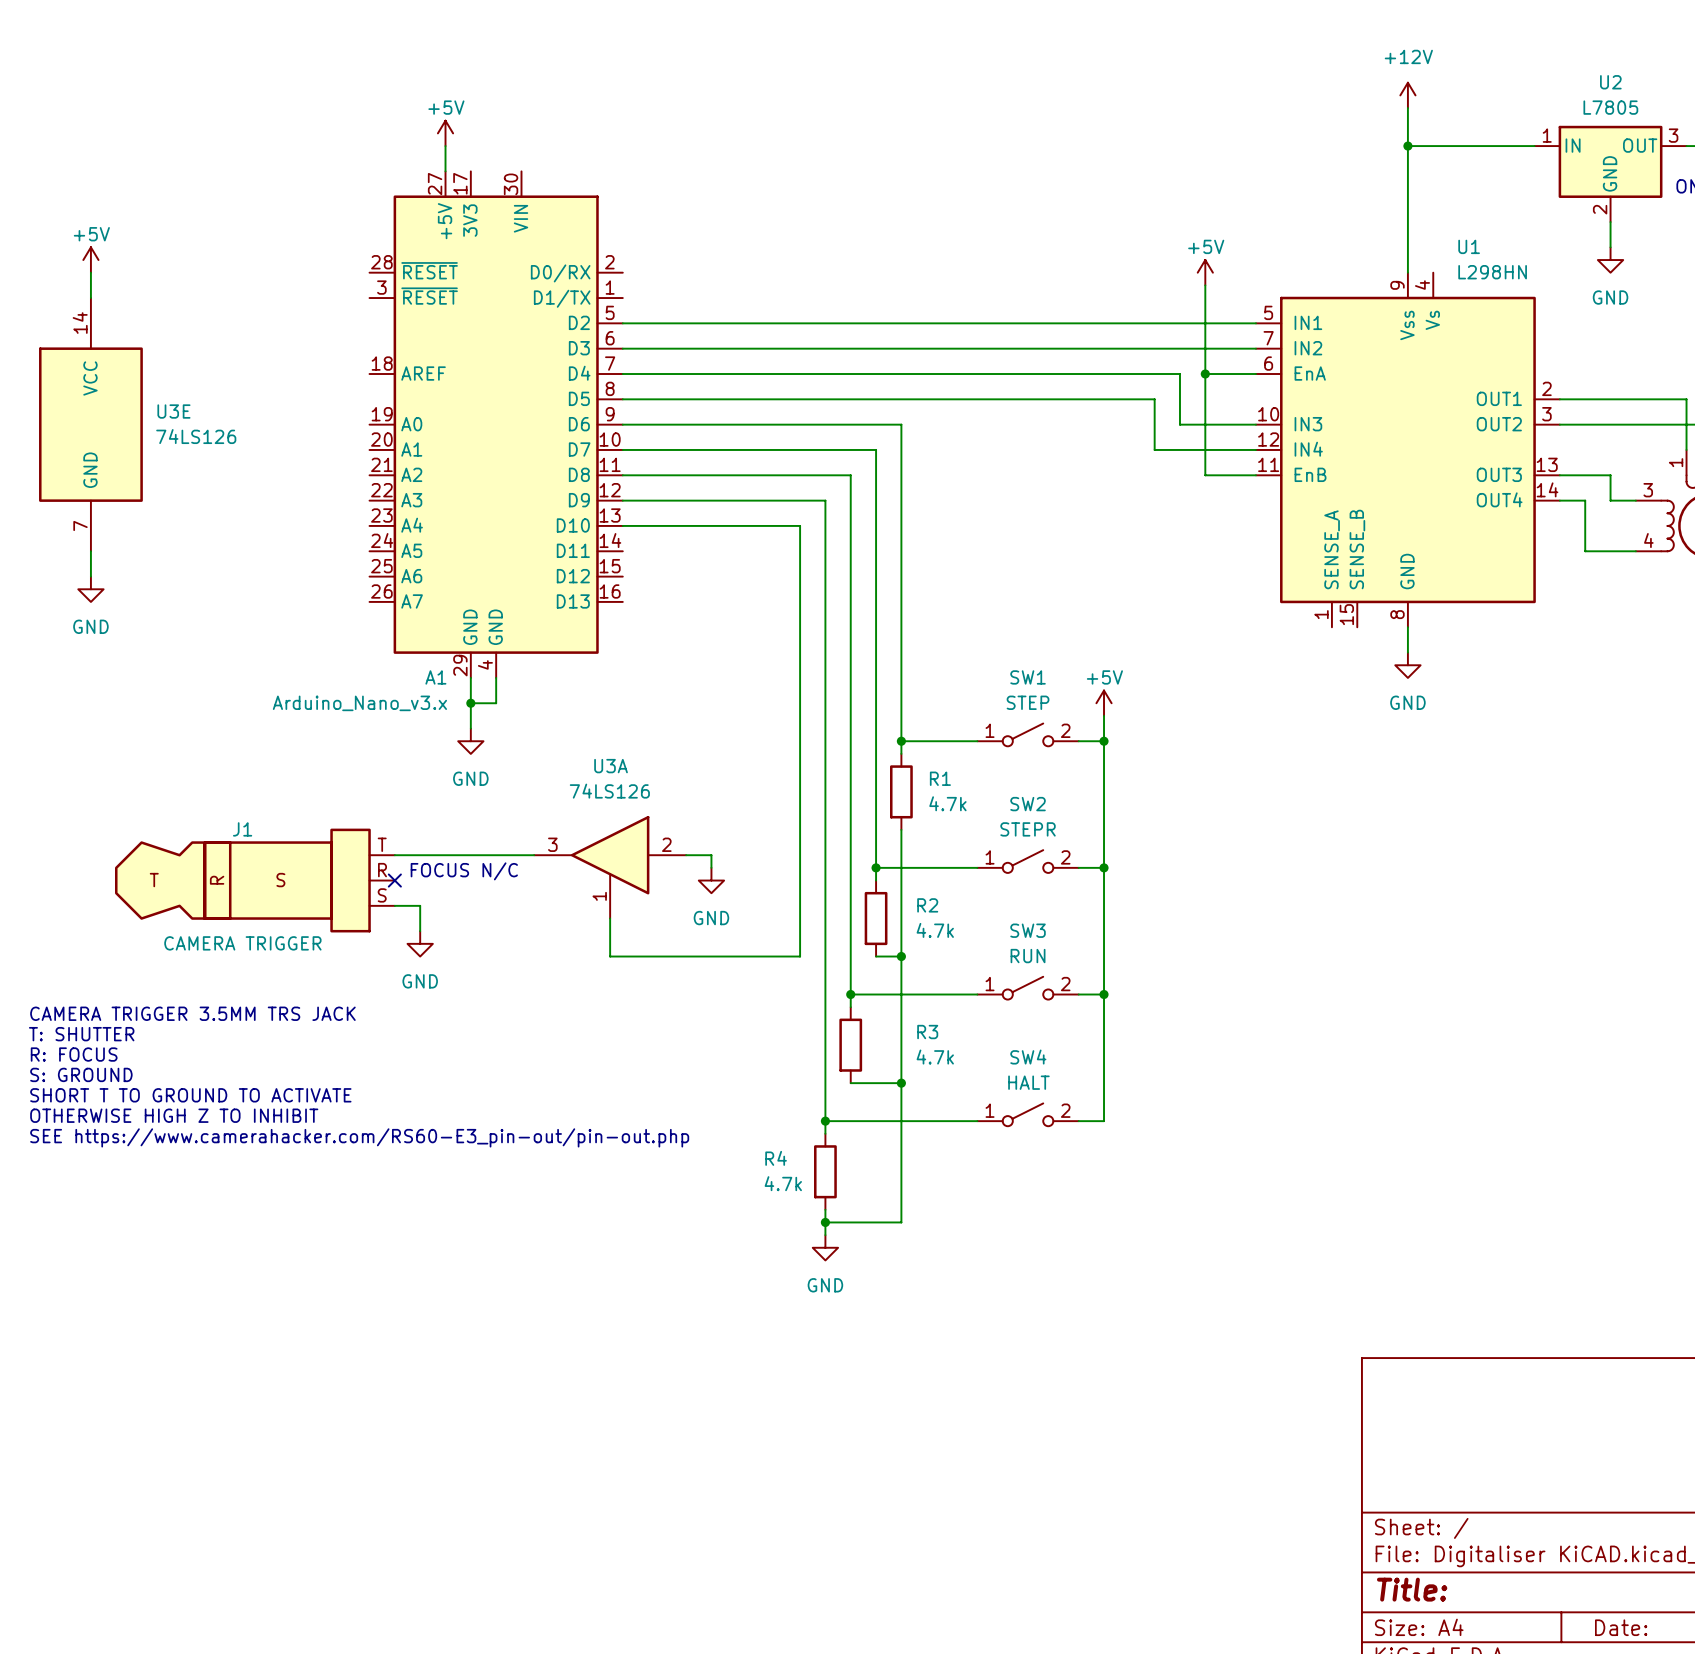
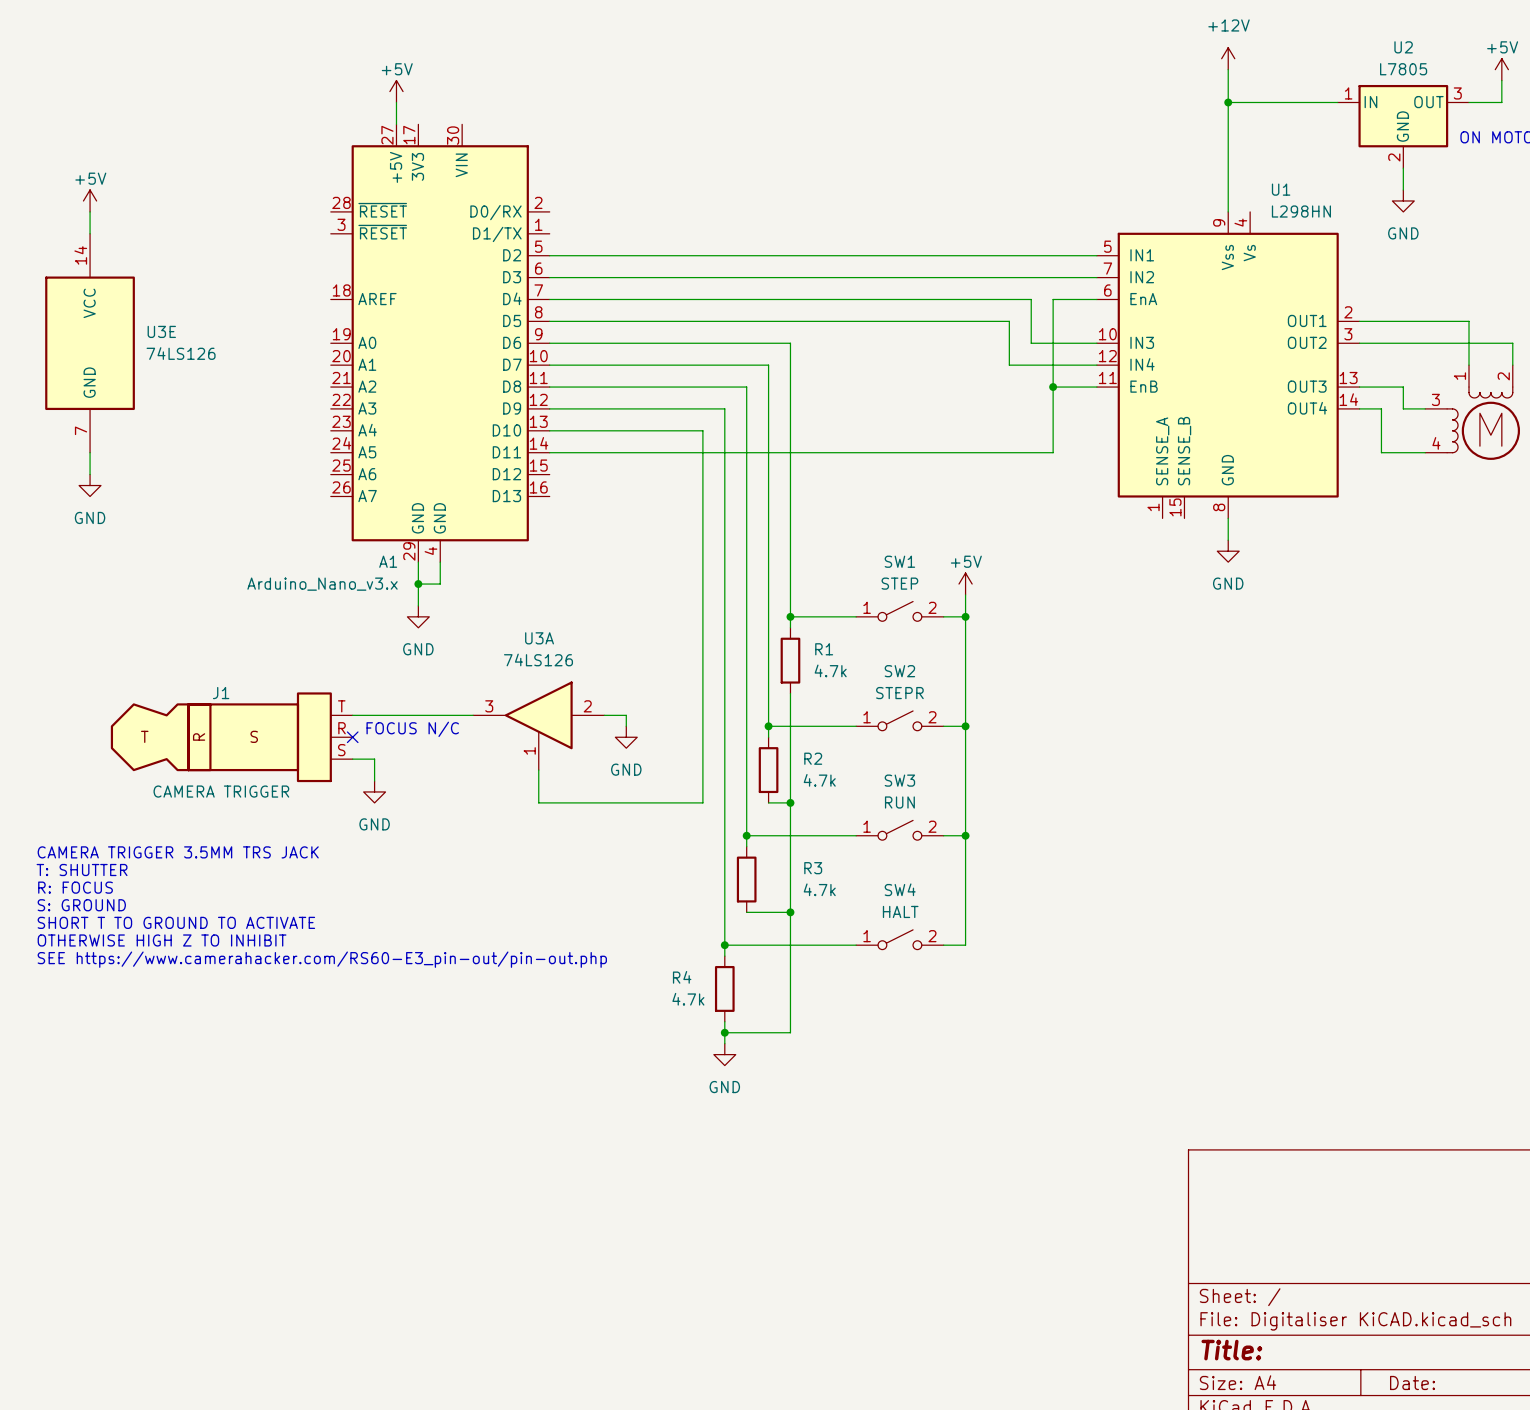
power symbol: +5V (1205, 272) -> none
wire: (1205, 285) (1205, 374) -> none
junction: (1205, 374) -> none
wire: none -> (1053, 387) (1053, 452) (549, 452)
junction: none -> (1053, 387)

